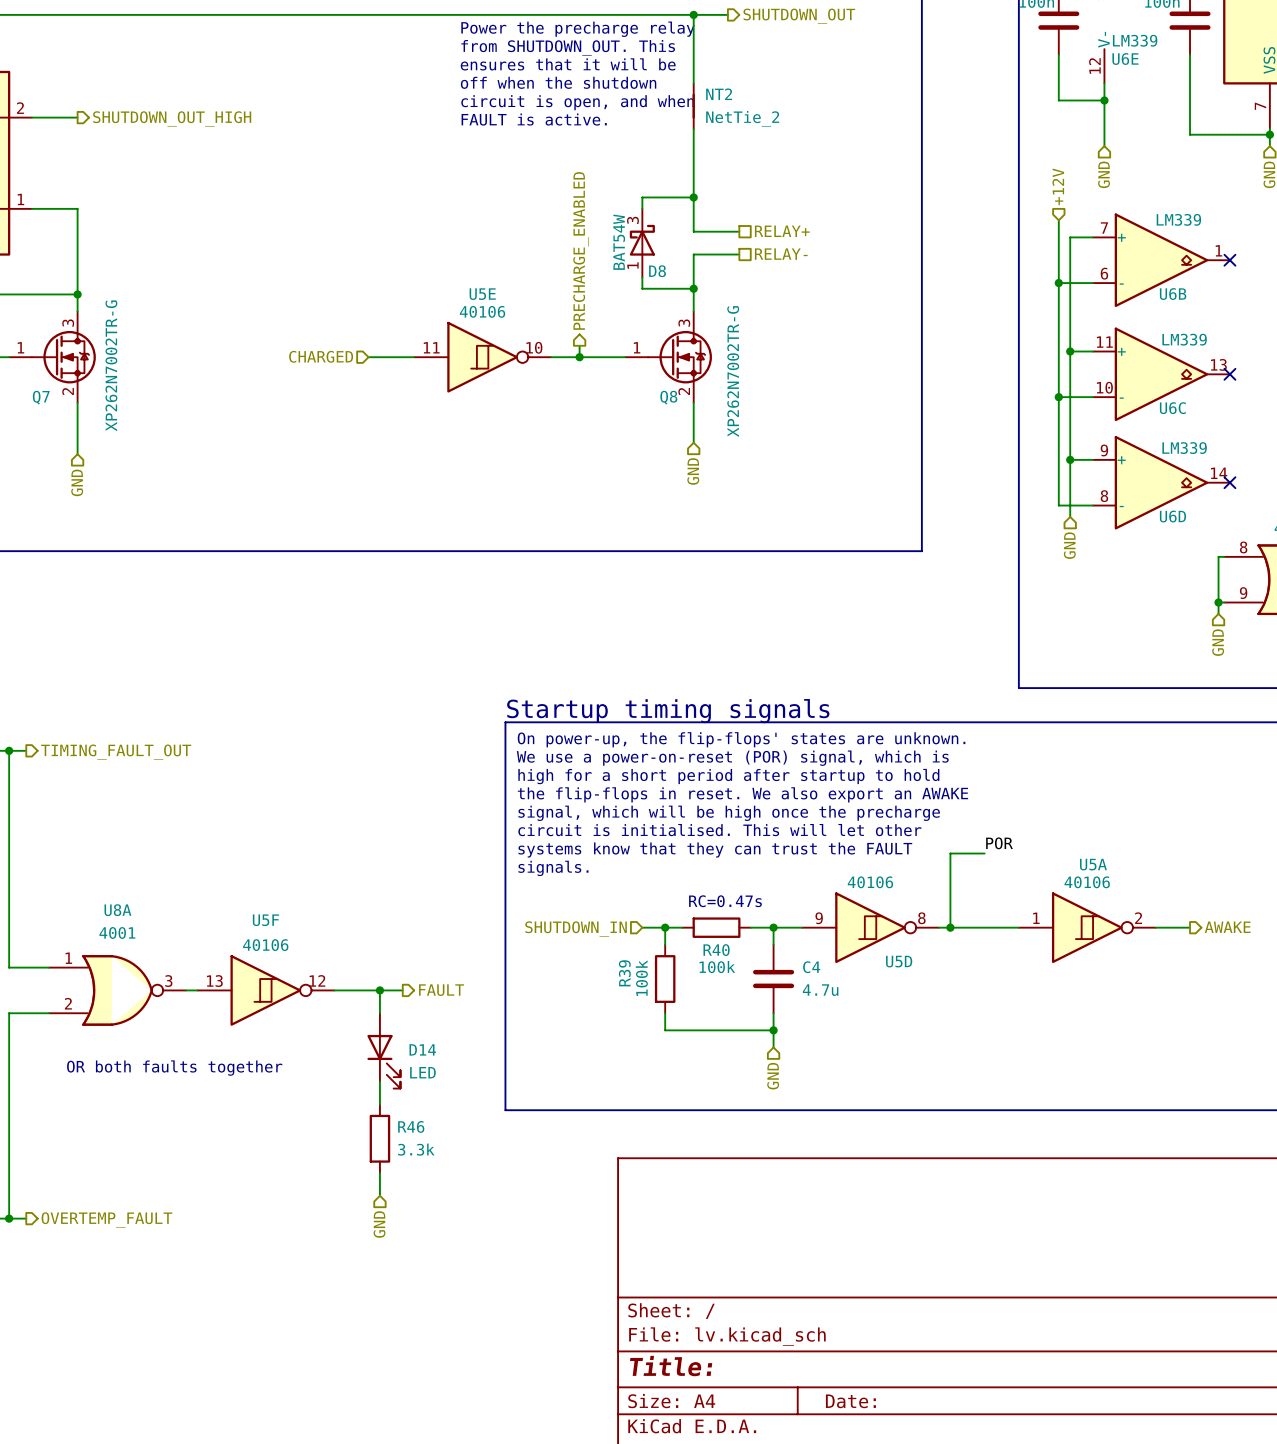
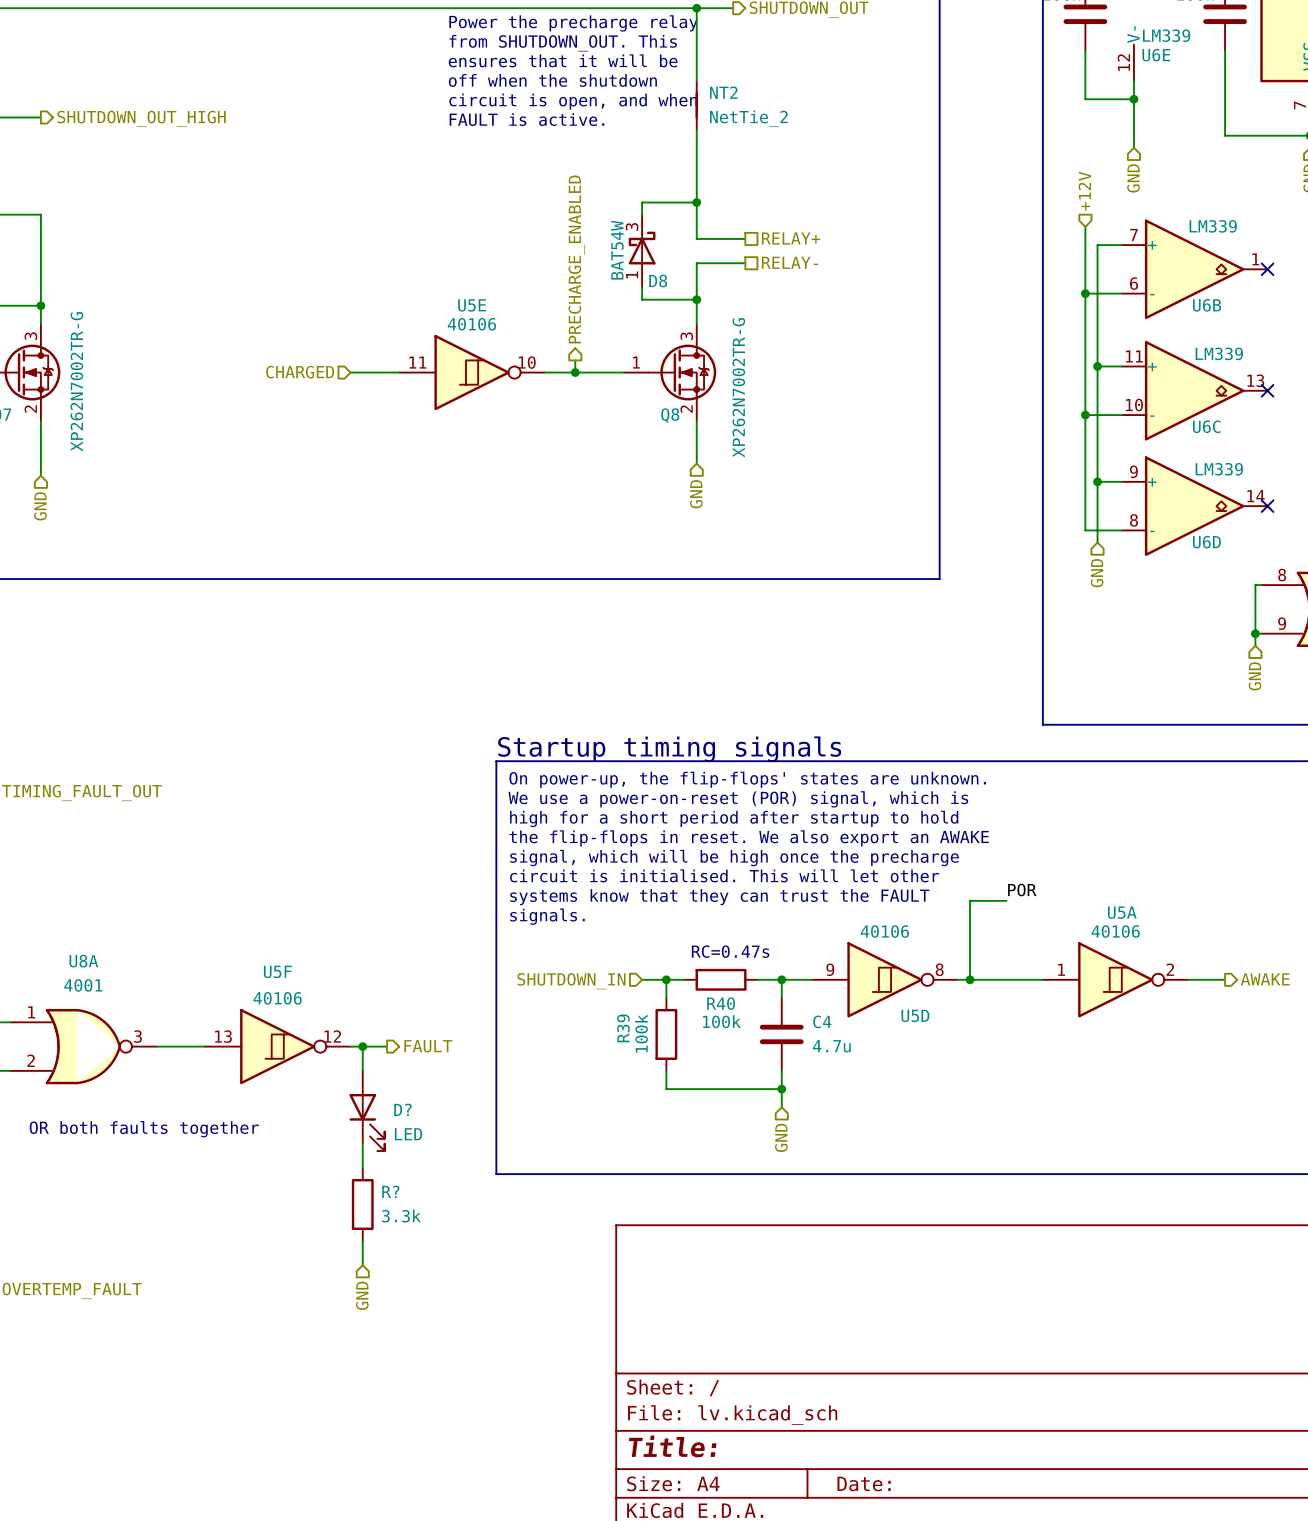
U5F position: (265, 990) -> (277, 1046)
D14 name: D14 (422, 1049) -> D? (402, 1109)
R46 name: R46 (411, 1126) -> R? (390, 1191)

